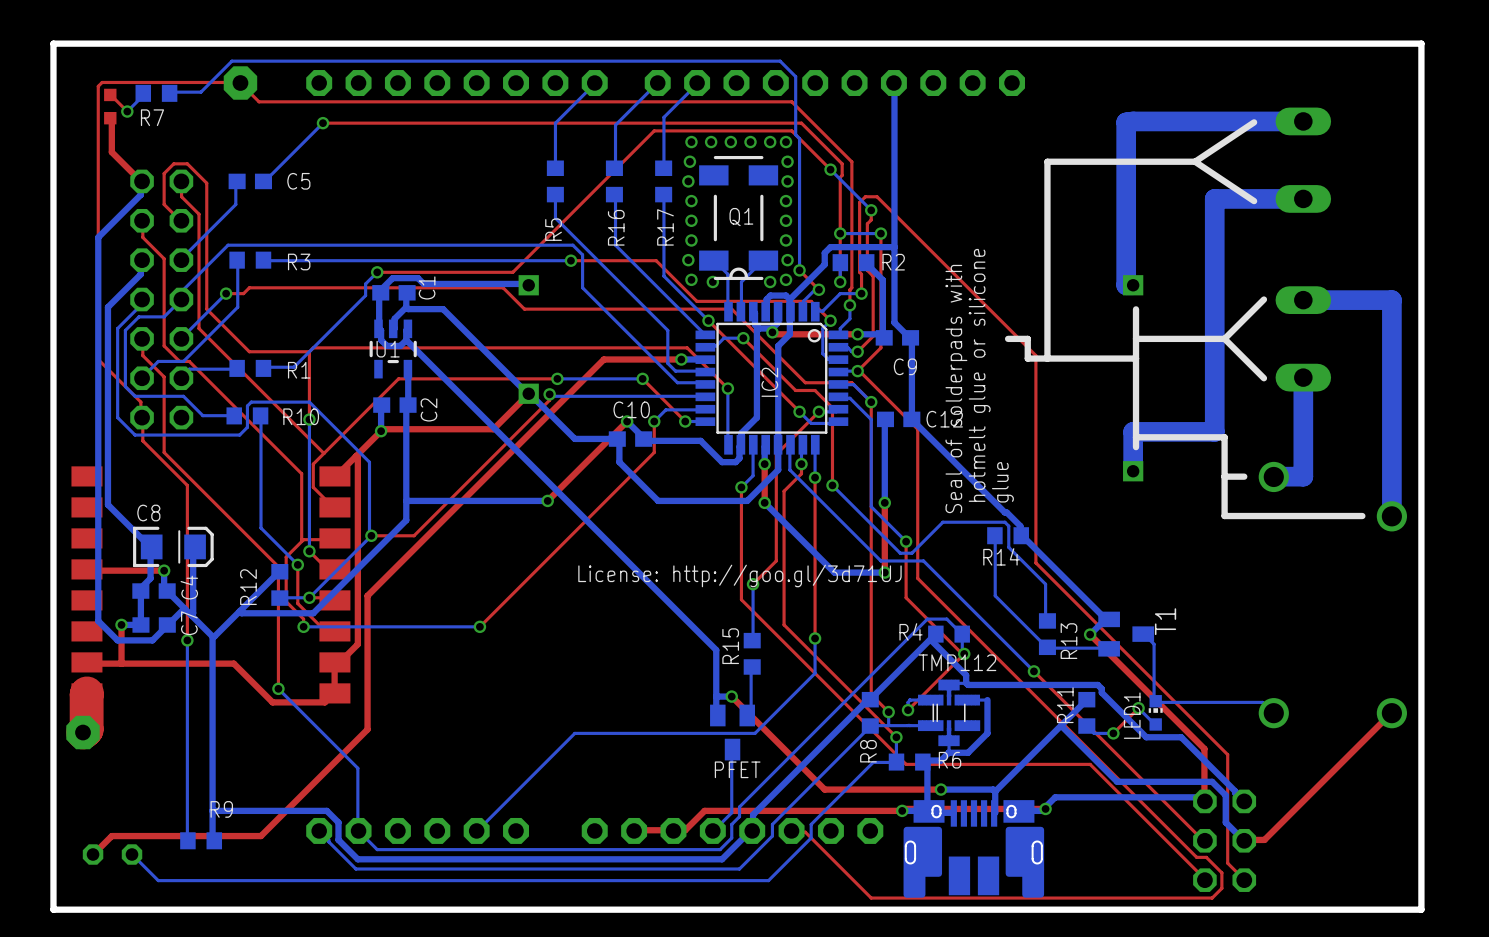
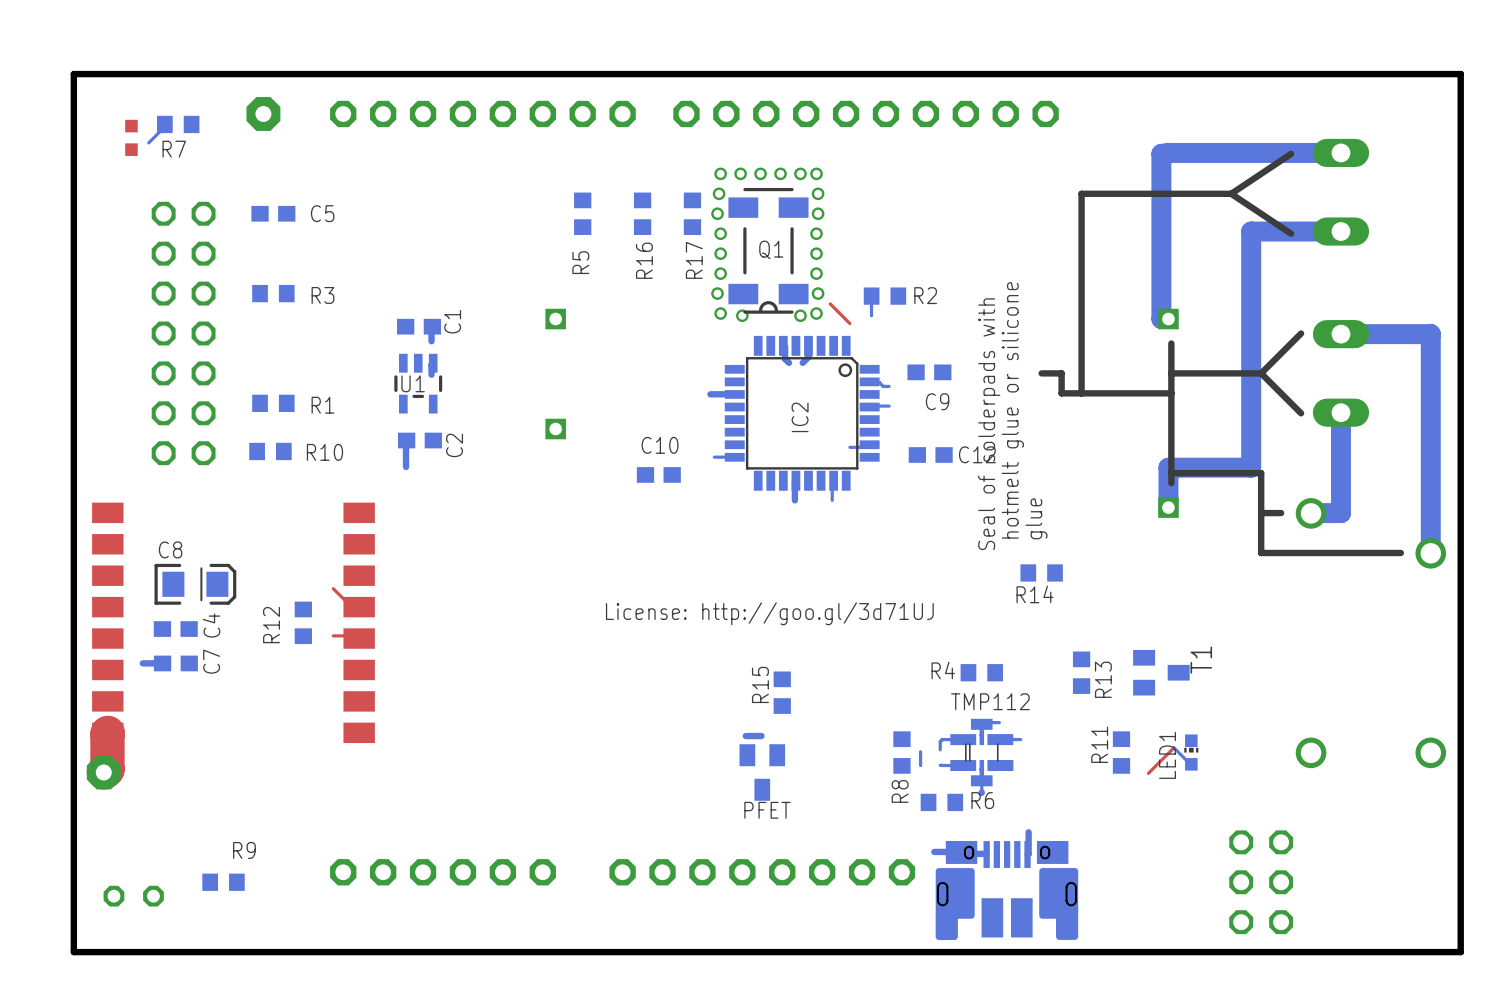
bottom track: (594, 83) (555, 123) (555, 168) -> none
bottom track: (657, 83) (615, 125) (614, 168) -> none
bottom track: (697, 83) (663, 117) (663, 168) -> none
bottom track: (893, 83) (894, 322) (911, 338) (911, 419) (1020, 526) (1021, 535) (1022, 535) (1107, 621) (1109, 619) (1103, 621) (1090, 634) -> none
bottom track: (169, 93) (200, 92) (231, 61) (780, 61) (795, 76) (795, 134) (799, 138) (799, 270) -> none
top track: (110, 94) (127, 111) -> none
via: (127, 111) -> none
top track: (110, 118) (111, 152) (142, 181) -> none
bottom track: (322, 123) (263, 181) -> none
top track: (322, 123) (801, 123) (842, 163) (842, 175) (840, 177) (840, 282) -> none
via: (322, 123) -> none
bottom track: (830, 169) (871, 210) -> none
top track: (830, 169) (791, 130) (654, 130) (512, 272) (377, 272) -> none
via: (830, 169) -> none
bottom track: (142, 181) (140, 194) (98, 237) (98, 621) (117, 640) (152, 640) (184, 608) -> none
top track: (181, 181) (181, 196) (199, 214) (199, 328) (323, 453) -> none
bottom track: (237, 181) (235, 204) (181, 260) -> none
bottom track: (555, 194) (555, 218) (667, 330) (667, 363) (675, 371) (705, 372) -> none
bottom track: (614, 194) (615, 245) (705, 334) -> none
bottom track: (663, 194) (663, 276) (708, 320) -> none
top track: (871, 210) (871, 220) (867, 223) (867, 270) (873, 276) (873, 336) (857, 351) -> none
via: (871, 210) -> none
top track: (142, 220) (142, 237) (164, 258) (164, 345) (179, 361) (189, 361) (301, 473) (302, 540) -> none
top track: (181, 220) (164, 204) (164, 173) (173, 163) (187, 163) (206, 183) (206, 309) (249, 351) (309, 351) -> none
via: (840, 233) -> none
bottom track: (880, 233) (840, 233) -> none
top track: (880, 233) (880, 347) (857, 371) (917, 429) (917, 578) (1196, 857) (1206, 857) (1221, 872) (1221, 888) (1212, 898) (871, 898) (805, 832) (791, 830) -> none
via: (880, 233) -> none
bottom track: (894, 247) (830, 247) (824, 252) (824, 264) (789, 299) -> none
bottom track: (142, 260) (140, 274) (107, 307) (107, 504) (151, 546) (150, 578) (140, 588) (140, 624) -> none
bottom track: (237, 260) (237, 307) (183, 361) (158, 361) (142, 378) -> none
bottom track: (263, 260) (570, 260) -> none
top track: (570, 260) (656, 260) (696, 301) (811, 301) (830, 320) -> none
via: (570, 260) -> none
bottom track: (713, 260) (727, 274) (728, 311) -> none
bottom track: (763, 260) (741, 282) (740, 311) -> none
bottom track: (866, 262) (882, 280) (884, 337) (880, 334) (857, 334) -> none
via: (799, 270) -> none
bottom track: (377, 272) (365, 283) (365, 295) (293, 367) (263, 368) -> none
via: (377, 272) -> none
via: (840, 282) -> none
bottom track: (528, 285) (423, 283) (417, 278) (392, 278) (379, 293) (378, 328) (381, 330) (381, 340) (386, 345) (400, 345) (406, 340) (716, 650) (716, 714) (717, 715) -> none
bottom track: (818, 289) (815, 289) (803, 301) (802, 311) -> none
via: (818, 289) -> none
bottom track: (226, 293) (181, 338) -> none
top track: (226, 293) (243, 293) (249, 287) (503, 287) (524, 309) (731, 309) (805, 382) (851, 382) (871, 402) (871, 694) (888, 712) -> none
via: (226, 293) -> none
bottom track: (861, 293) (840, 293) (822, 311) (815, 311) -> none
top track: (861, 293) (859, 202) (865, 196) (877, 196) (1035, 355) (1035, 562) (1227, 754) (1227, 863) (1244, 880) -> none
via: (861, 293) -> none
bottom track: (142, 299) (140, 305) (117, 328) (117, 417) (135, 435) (239, 435) (247, 427) (247, 405) (251, 402) (309, 402) (369, 462) (369, 535) (371, 535) (309, 597) (279, 598) -> none
bottom track: (181, 299) (181, 291) (228, 245) (572, 245) (582, 254) (582, 287) (677, 382) (704, 382) (705, 384) -> none
bottom track: (181, 299) (164, 316) (138, 316) (125, 330) (125, 386) (135, 396) (183, 396) (202, 415) (234, 415) -> none
bottom track: (789, 299) (789, 334) (778, 345) (778, 444) -> none
bottom track: (789, 299) (785, 295) (770, 295) (766, 299) (765, 311) -> none
bottom track: (849, 305) (849, 318) (840, 328) (840, 334) (838, 334) -> none
top track: (849, 305) (849, 289) (851, 287) (851, 161) (791, 101) (259, 101) (239, 82) (102, 82) (98, 86) (98, 359) (140, 402) (142, 440) (187, 485) (187, 640) -> none
via: (849, 305) -> none
top track: (708, 320) (799, 411) -> none
via: (708, 320) -> none
bottom track: (830, 320) (822, 328) (822, 353) (828, 359) (838, 359) -> none
via: (830, 320) -> none
bottom track: (393, 328) (394, 318) (406, 307) (408, 309) (443, 309) (574, 438) (615, 438) (619, 440) (619, 462) (658, 500) (747, 500) (778, 469) (778, 444) -> none
bottom track: (772, 332) (772, 328) (758, 328) (756, 330) (756, 417) (741, 433) (739, 458) (735, 462) (722, 462) (700, 440) (644, 440) (627, 421) -> none
top track: (772, 332) (774, 334) (857, 334) -> none
via: (772, 332) -> none
via: (857, 334) -> none
top track: (142, 338) (142, 355) (164, 376) (164, 452) (278, 566) (278, 688) -> none
bottom track: (743, 338) (724, 338) (716, 345) (705, 347) -> none
top track: (743, 338) (795, 390) (815, 390) (832, 407) (832, 485) -> none
via: (743, 338) -> none
top track: (309, 351) (313, 347) (687, 347) (727, 388) -> none
top track: (309, 351) (309, 419) -> none
via: (857, 351) -> none
top track: (681, 359) (603, 359) (367, 595) (367, 729) (260, 836) (111, 836) (93, 854) -> none
via: (681, 359) -> none
bottom track: (237, 368) (189, 369) (181, 378) -> none
bottom track: (407, 369) (406, 520) (313, 613) (241, 613) (239, 611) -> none
via: (857, 371) -> none
top track: (557, 378) (398, 378) (313, 464) (313, 487) (334, 507) -> none
via: (557, 378) -> none
bottom track: (642, 378) (557, 378) -> none
top track: (642, 378) (685, 421) -> none
via: (642, 378) -> none
bottom track: (838, 384) (853, 384) (871, 402) -> none
bottom track: (727, 388) (728, 444) -> none
via: (727, 388) -> none
top track: (528, 393) (493, 429) (383, 429) (334, 475) -> none
bottom track: (549, 394) (551, 396) (705, 396) -> none
top track: (549, 394) (549, 400) (414, 535) (371, 535) -> none
via: (549, 394) -> none
bottom track: (838, 396) (849, 398) (871, 419) (871, 506) (906, 541) -> none
via: (871, 402) -> none
bottom track: (705, 409) (665, 409) (654, 421) -> none
bottom track: (799, 411) (811, 423) (838, 423) (838, 421) -> none
via: (799, 411) -> none
top track: (818, 411) (776, 454) (776, 560) (753, 584) -> none
via: (818, 411) -> none
bottom track: (260, 415) (260, 528) (297, 564) -> none
bottom track: (309, 419) (309, 551) -> none
via: (309, 419) -> none
bottom track: (885, 419) (884, 502) -> none
top track: (627, 421) (547, 500) -> none
via: (627, 421) -> none
top track: (654, 421) (654, 452) (479, 626) -> none
via: (654, 421) -> none
via: (685, 421) -> none
via: (381, 431) -> none
bottom track: (753, 444) (753, 475) (741, 487) -> none
bottom track: (790, 444) (789, 469) (880, 560) (923, 560) (1033, 671) -> none
bottom track: (815, 444) (815, 477) -> none
top track: (355, 456) (357, 458) (357, 644) (342, 659) (336, 659) (334, 662) (334, 693) -> none
top track: (764, 464) (764, 502) -> none
via: (764, 464) -> none
top track: (801, 464) (801, 473) (784, 491) (784, 624) (896, 737) -> none
via: (801, 464) -> none
top track: (815, 477) (815, 638) -> none
via: (815, 477) -> none
bottom track: (832, 485) (900, 553) (911, 553) (942, 522) (1004, 522) (1008, 526) (1008, 547) (1045, 584) (1045, 619) (1047, 620) -> none
via: (832, 485) -> none
top track: (741, 487) (741, 599) (906, 764) (1090, 764) (1204, 880) -> none
via: (741, 487) -> none
bottom track: (547, 500) (406, 500) -> none
via: (547, 500) -> none
bottom track: (764, 502) (834, 572) (884, 572) -> none
via: (764, 502) -> none
top track: (884, 502) (884, 572) -> none
via: (884, 502) -> none
via: (371, 535) -> none
bottom track: (993, 535) (995, 535) (995, 595) (1047, 648) (1109, 648) -> none
top track: (334, 538) (303, 539) (286, 557) (286, 601) (303, 619) (303, 626) -> none
top track: (906, 541) (906, 597) (964, 653) (908, 710) -> none
via: (906, 541) -> none
bottom track: (195, 546) (193, 547) (193, 613) (191, 615) -> none
via: (309, 551) -> none
top track: (297, 564) (297, 603) (324, 630) (334, 631) -> none
via: (297, 564) -> none
top track: (86, 569) (164, 570) -> none
bottom track: (164, 570) (164, 590) (212, 636) -> none
via: (164, 570) -> none
bottom track: (279, 571) (212, 636) -> none
via: (884, 572) -> none
bottom track: (753, 584) (752, 640) -> none
via: (753, 584) -> none
via: (309, 597) -> none
top track: (121, 624) (121, 663) -> none
via: (121, 624) -> none
via: (303, 626) -> none
bottom track: (479, 626) (303, 626) -> none
via: (479, 626) -> none
top track: (1090, 634) (1204, 748) (1204, 801) -> none
via: (1090, 634) -> none
bottom track: (1143, 634) (1154, 644) (1154, 700) (1156, 702) (1262, 702) (1273, 713) -> none
bottom track: (212, 636) (212, 839) (214, 840) -> none
bottom track: (815, 638) (815, 673) (755, 733) (574, 733) (476, 830) -> none
via: (815, 638) -> none
bottom track: (187, 640) (187, 840) -> none
via: (187, 640) -> none
bottom track: (964, 653) (962, 652) (962, 634) (946, 619) (927, 619) (739, 807) (739, 816) (731, 824) (731, 838) (720, 849) (377, 849) (357, 830) (357, 768) (278, 688) -> none
via: (964, 653) -> none
top track: (86, 661) (88, 663) (233, 663) (272, 702) (324, 702) (334, 693) -> none
bottom track: (752, 666) (751, 710) (747, 715) -> none
top track: (1033, 671) (1204, 840) -> none
via: (1033, 671) -> none
bottom track: (966, 683) (968, 684) (1097, 684) (1101, 688) (1101, 692) (1146, 737) (1181, 737) (1244, 801) -> none
bottom track: (966, 683) (966, 675) (931, 640) (935, 634) (753, 814) (753, 830) (722, 859) (357, 859) (338, 839) (338, 822) (326, 810) (212, 810) -> none
via: (278, 688) -> none
top track: (731, 696) (824, 789) (940, 789) -> none
via: (731, 696) -> none
bottom track: (1086, 699) (995, 791) (993, 789) (940, 789) -> none
bottom track: (987, 700) (987, 733) (968, 752) (948, 752) (940, 760) (923, 760) (922, 762) (927, 762) (927, 808) (929, 811) -> none
via: (1138, 708) -> none
via: (908, 710) -> none
via: (888, 712) -> none
top track: (1391, 713) (1264, 839) (1244, 840) -> none
bottom track: (908, 725) (870, 726) (772, 824) (772, 836) (739, 868) (355, 868) (319, 830) -> none
bottom track: (1061, 725) (1117, 781) (1212, 781) (1225, 795) (1225, 822) (1244, 840) -> none
bottom track: (1086, 726) (1094, 733) (1113, 733) -> none
via: (1113, 733) -> none
bottom track: (896, 737) (896, 762) (873, 762) (811, 824) (811, 838) (768, 880) (158, 880) (132, 854) -> none
via: (896, 737) -> none
bottom track: (732, 749) (731, 812) (712, 830) -> none
via: (940, 789) -> none
bottom track: (1204, 801) (1200, 797) (1055, 797) (1041, 810) (1018, 811) -> none
top track: (1045, 808) (704, 810) (685, 830) (634, 830) -> none
via: (1045, 808) -> none
via: (902, 810) -> none

